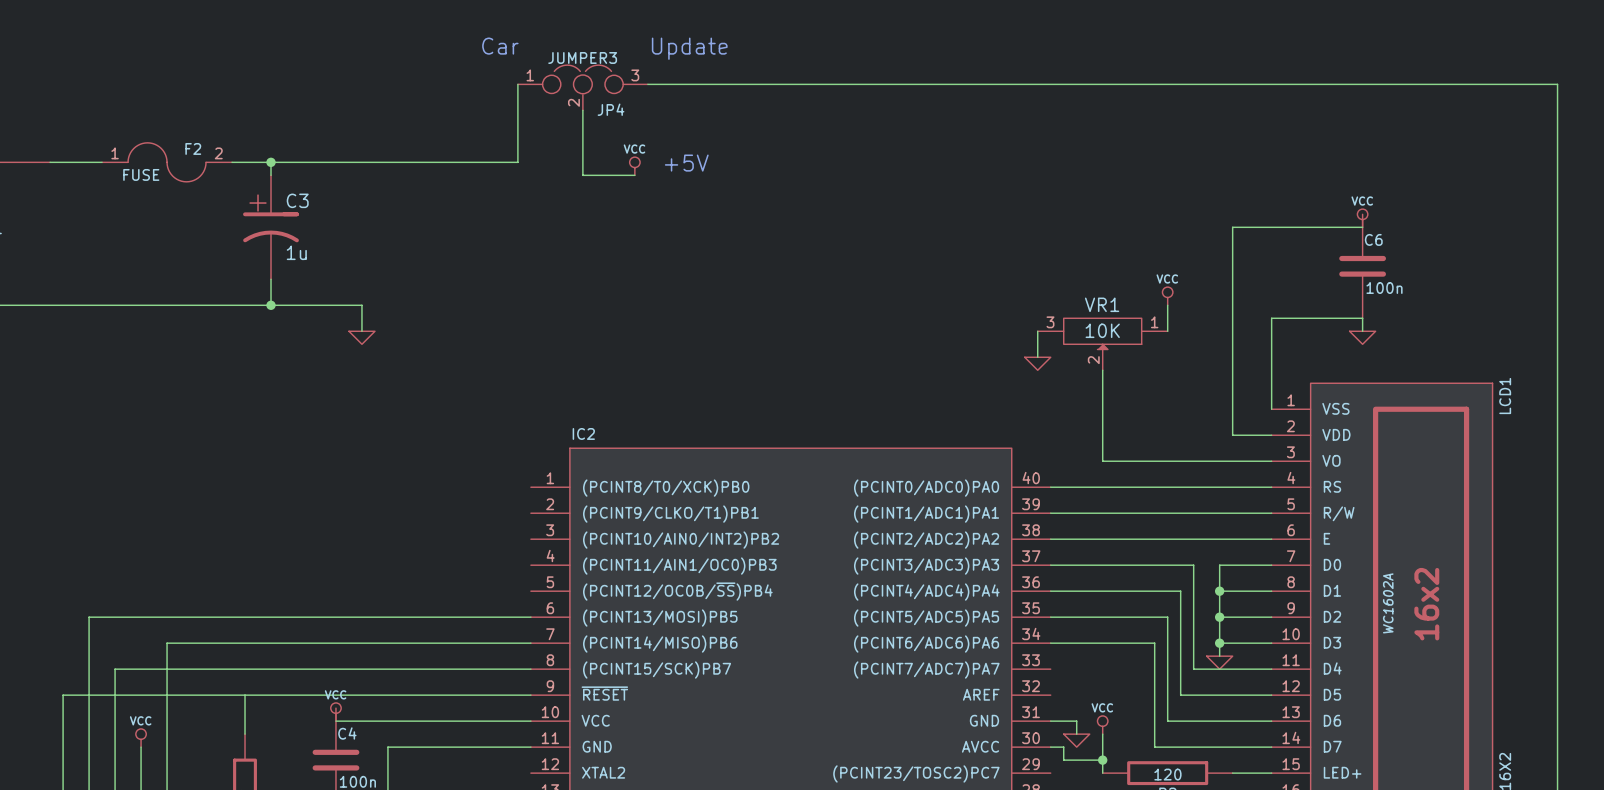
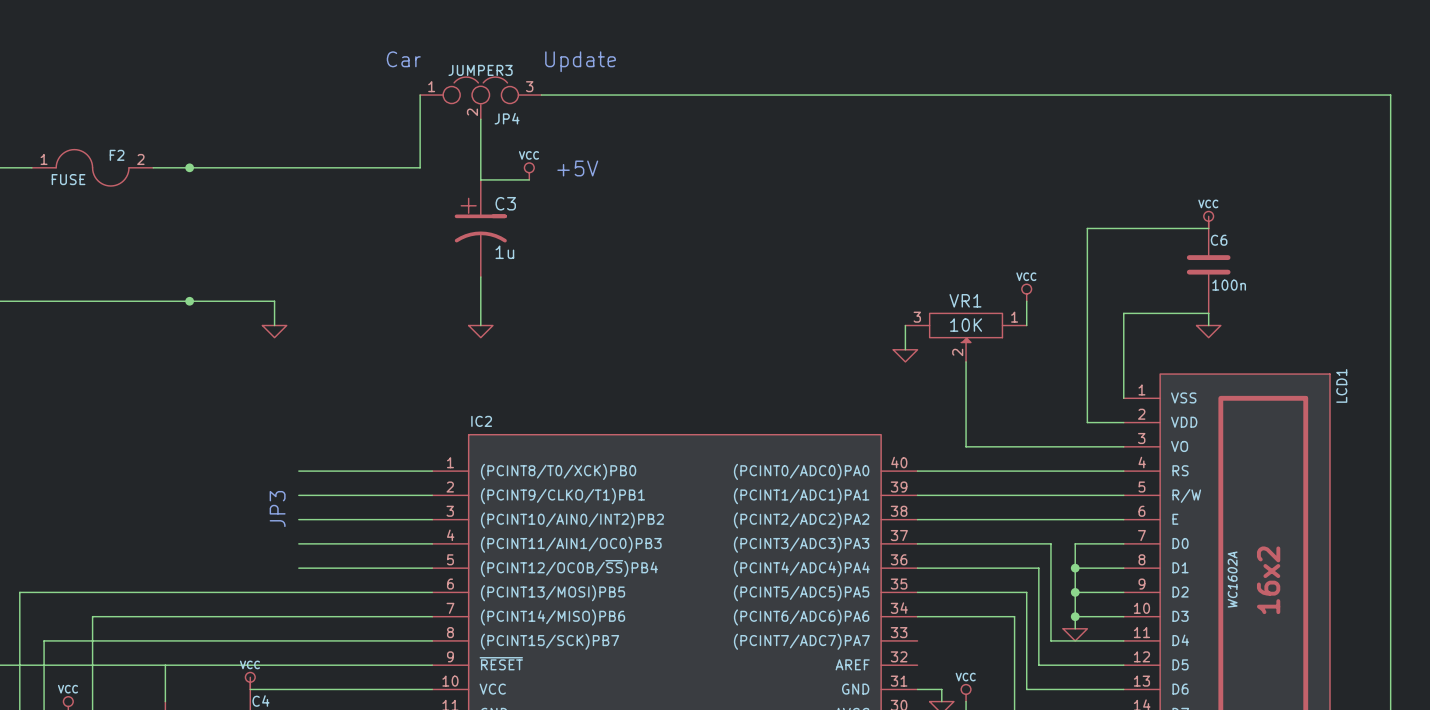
wire: (271, 162) (271, 175) -> none
C3 position: (271, 227) -> (480, 228)
wire: (271, 279) (271, 305) -> none
wire: none -> (480, 276) (480, 325)
power symbol: none -> (480, 331)
wire: none -> (298, 471) (432, 471)
wire: none -> (298, 495) (432, 495)
text: none -> JP3 (277, 509)
wire: none -> (298, 519) (432, 519)
wire: none -> (298, 543) (432, 543)
wire: none -> (298, 568) (432, 568)

